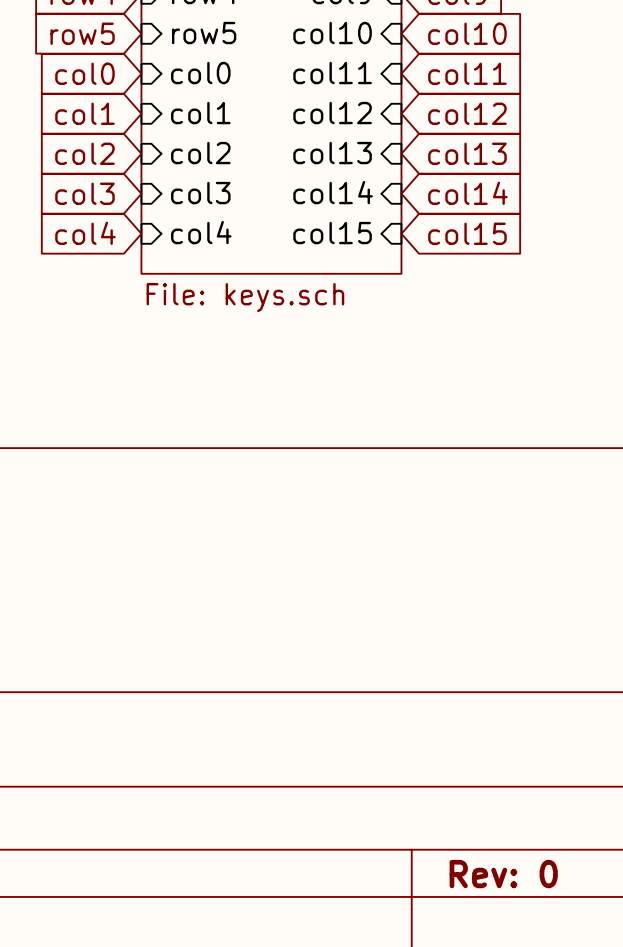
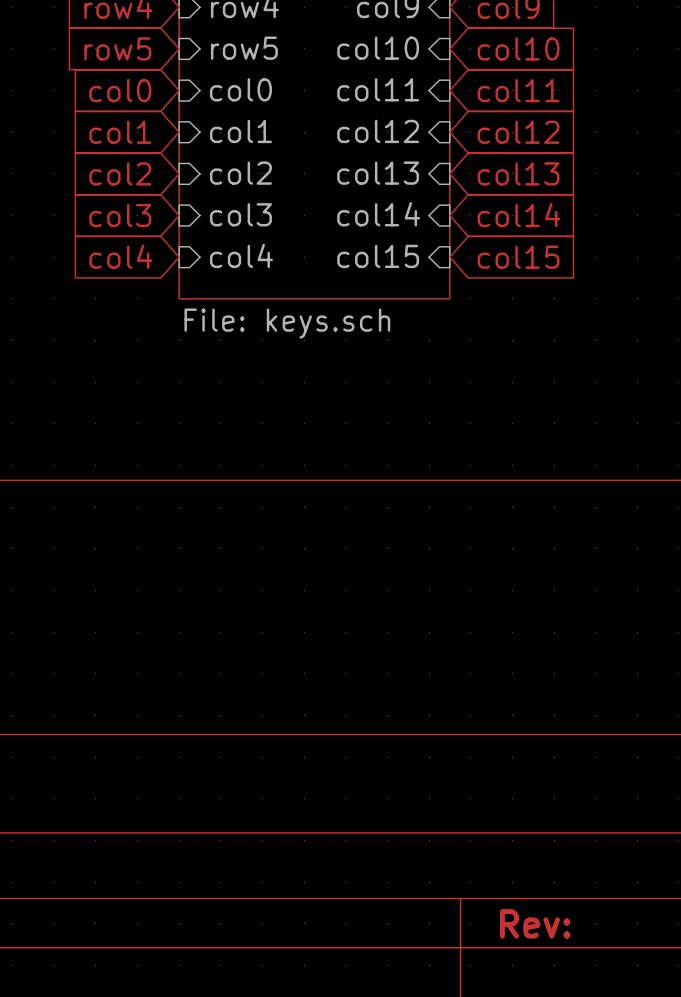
title block: Rev: 0 (503, 874) -> Rev: (535, 923)

